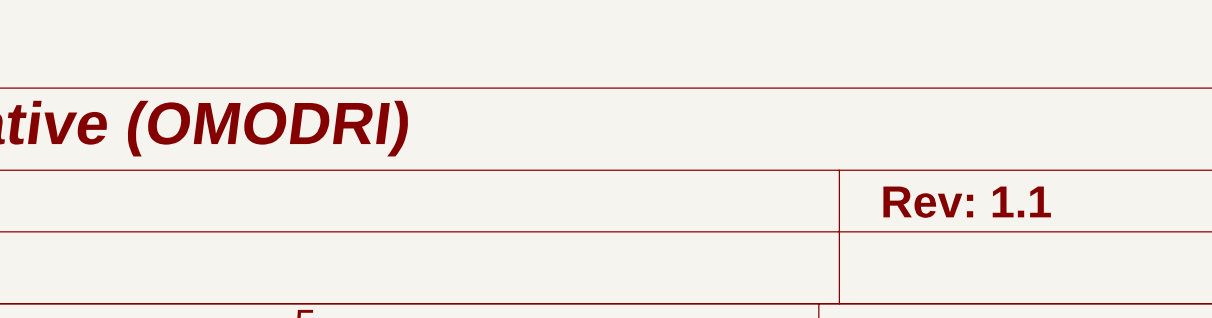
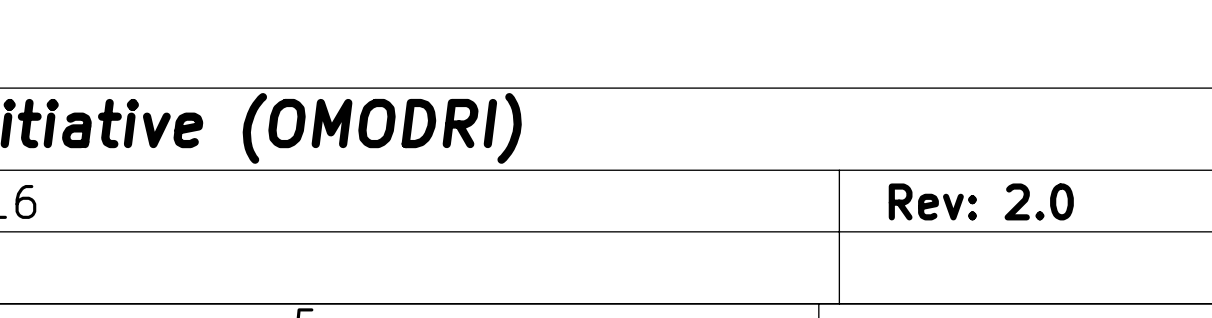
title block: Rev: 1.1 (967, 202) -> Rev: 2.0 (981, 201)

